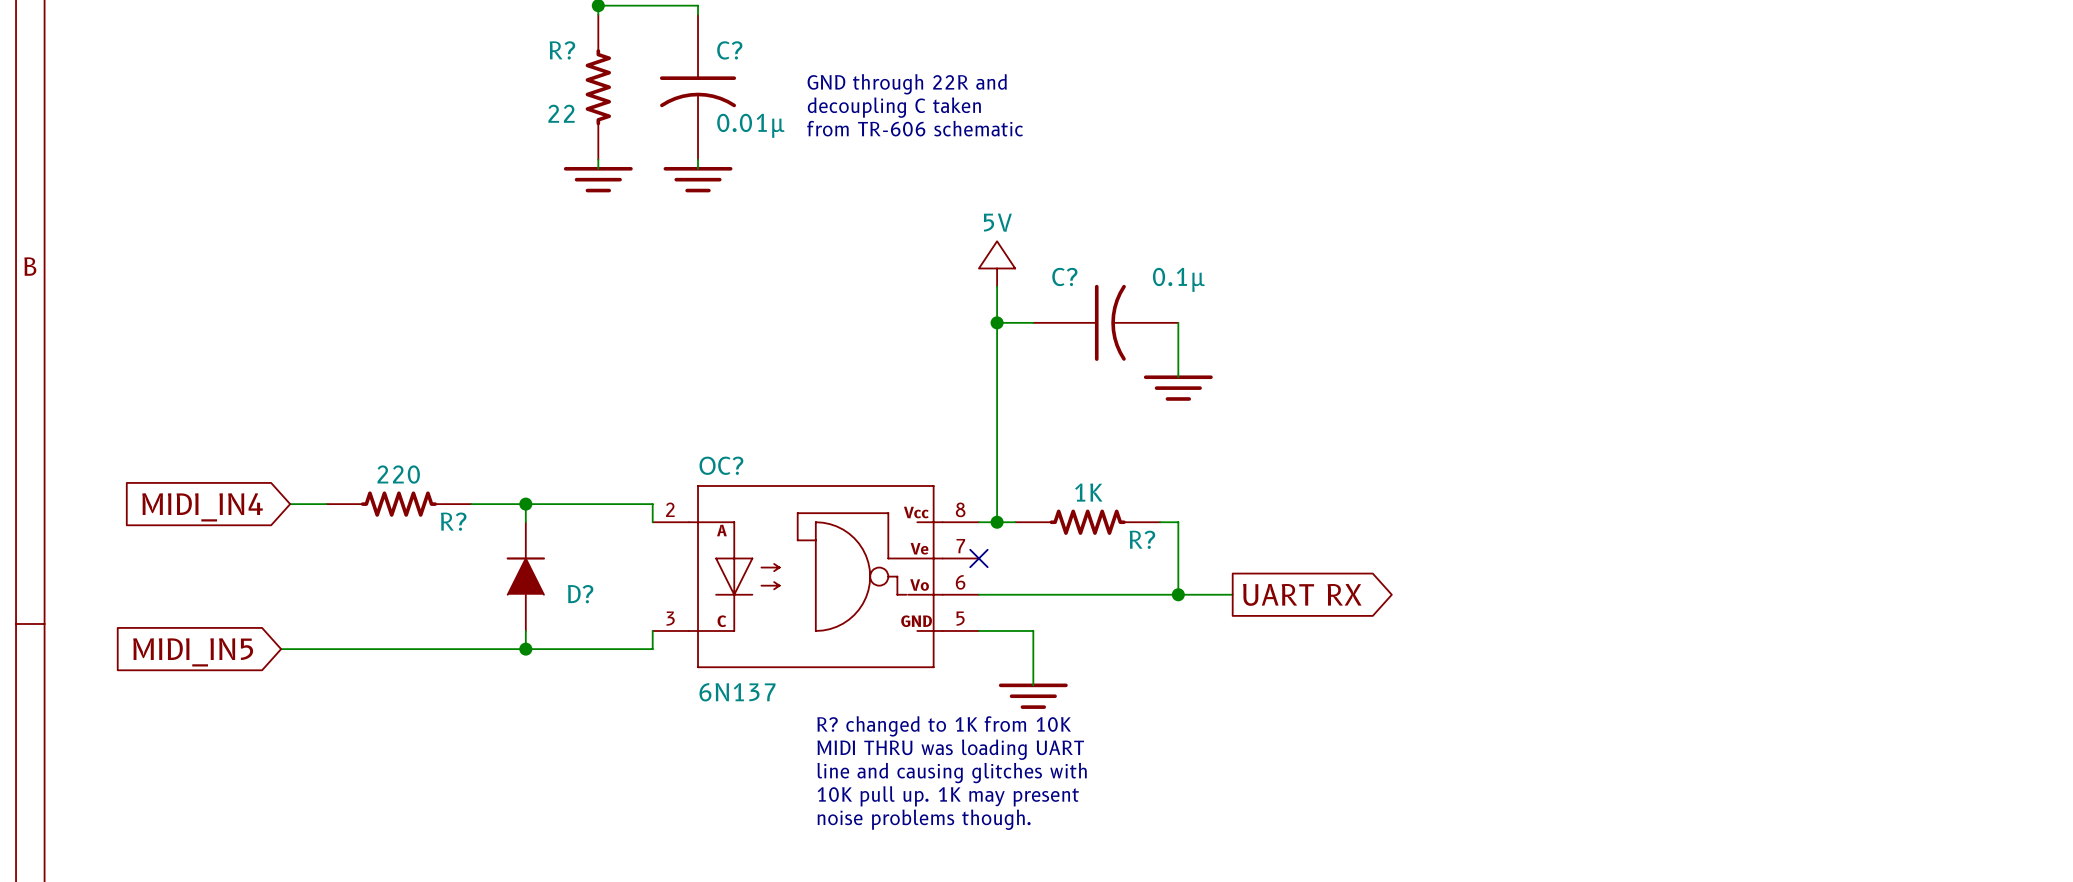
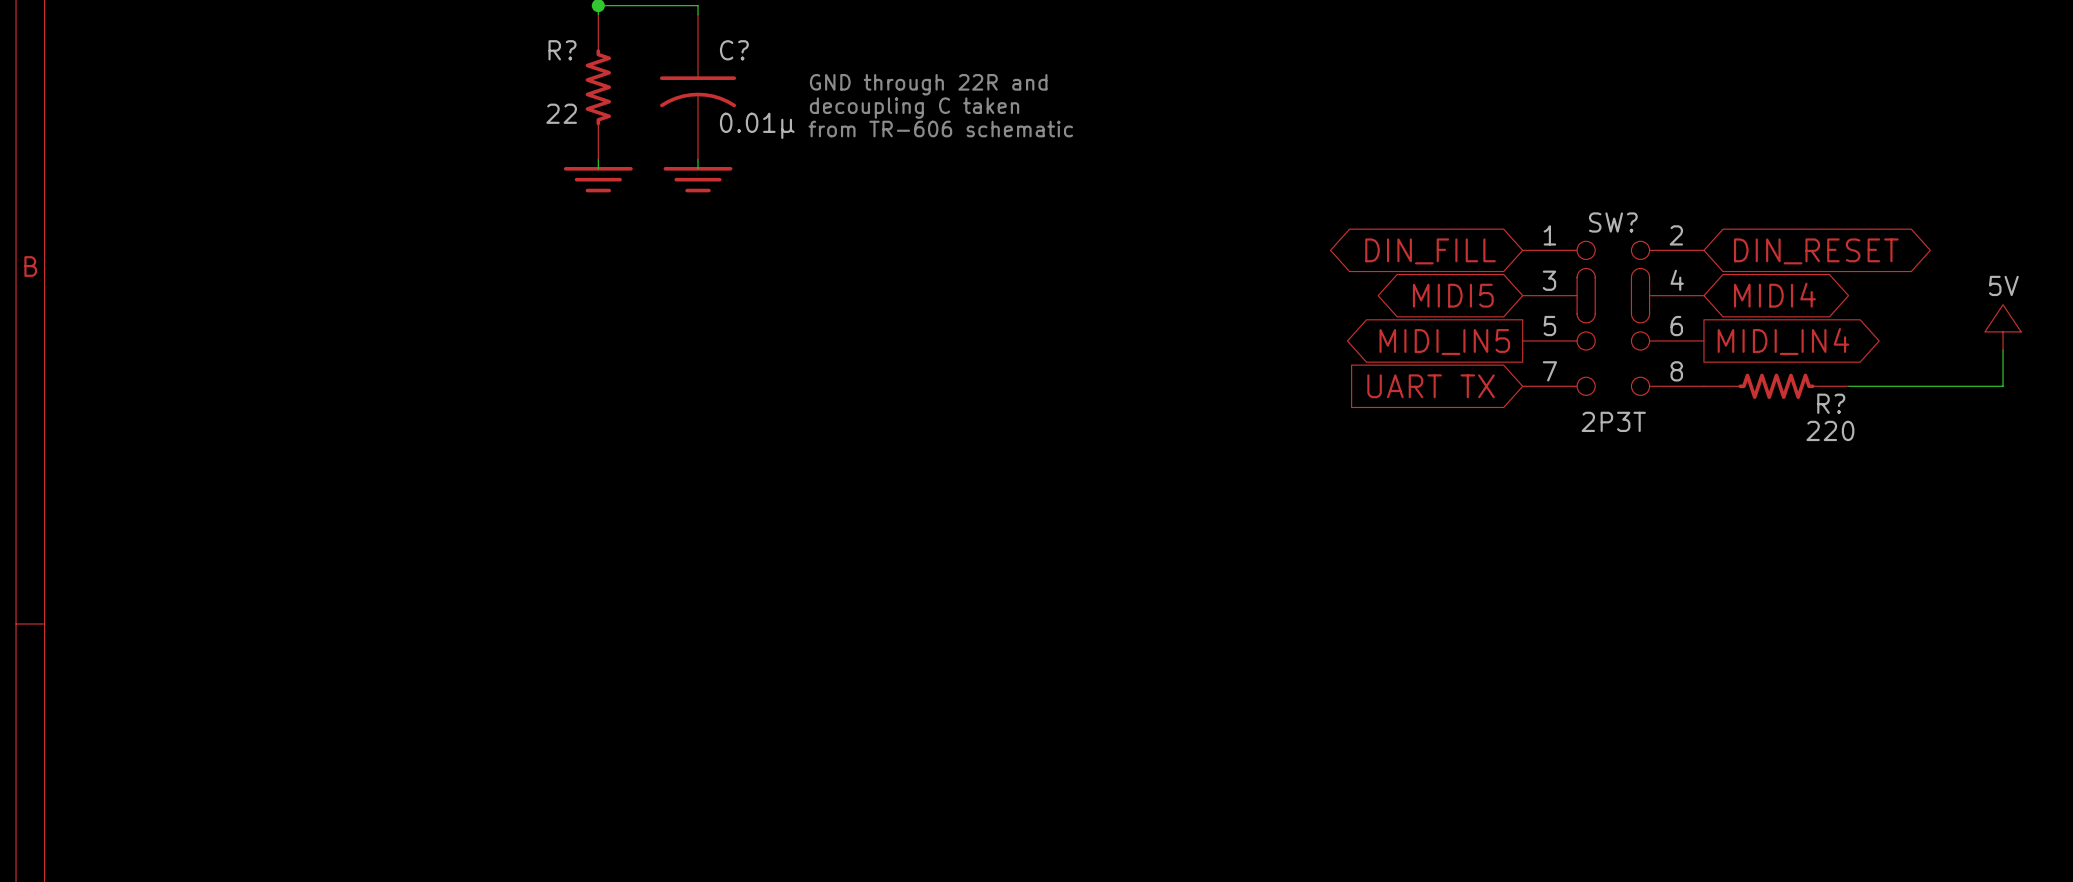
global label: none -> DIN_FILL (1430, 251)
global label: none -> DIN_RESET (1816, 251)
power symbol: 5V (997, 263) -> none
wire: (997, 286) (997, 522) -> none
global label: none -> MIDI5 (1453, 295)
global label: none -> MIDI4 (1774, 295)
SW?: none -> 2P3T (1613, 318)
wire: (997, 322) (1033, 322) -> none
junction: (997, 322) -> none
C?: 0.1µ (1105, 322) -> none
wire: (1178, 322) (1178, 377) -> none
power symbol: none -> 5V (2003, 327)
global label: none -> MIDI_IN5 (1444, 342)
global label: none -> MIDI_IN4 (1783, 341)
wire: none -> (2003, 350) (2003, 386) (1848, 386)
global label: none -> UART TX (1431, 386)
R?: none -> 220 (1776, 386)
power symbol: (1178, 388) -> none
wire: (290, 504) (326, 504) -> none
R?: 220 (398, 504) -> none
wire: (471, 504) (652, 504) (652, 522) -> none
wire: (525, 504) (525, 522) -> none
junction: (525, 504) -> none
global label: MIDI_IN4 (202, 507) -> none
wire: (978, 522) (1015, 522) -> none
junction: (997, 522) -> none
R?: 1K (1087, 522) -> none
wire: (1160, 522) (1178, 522) (1178, 594) -> none
no-connect mark: (978, 558) -> none
D?: (525, 576) -> none
OC?: 6N137 (815, 576) -> none
wire: (978, 594) (1232, 594) -> none
junction: (1178, 594) -> none
global label: UART RX (1302, 594) -> none
wire: (525, 630) (525, 649) -> none
wire: (652, 630) (652, 649) (281, 649) -> none
wire: (978, 630) (1033, 630) (1033, 685) -> none
junction: (525, 649) -> none
global label: MIDI_IN5 (193, 652) -> none
power symbol: (1033, 696) -> none
text: R? changed to 1K from 10K (944, 726) -> none
text: MIDI THRU was loading UART (950, 749) -> none
text: line and causing glitches with (952, 773) -> none
text: 10K pull up. 1K may present (948, 796) -> none
text: noise problems though. (924, 819) -> none

